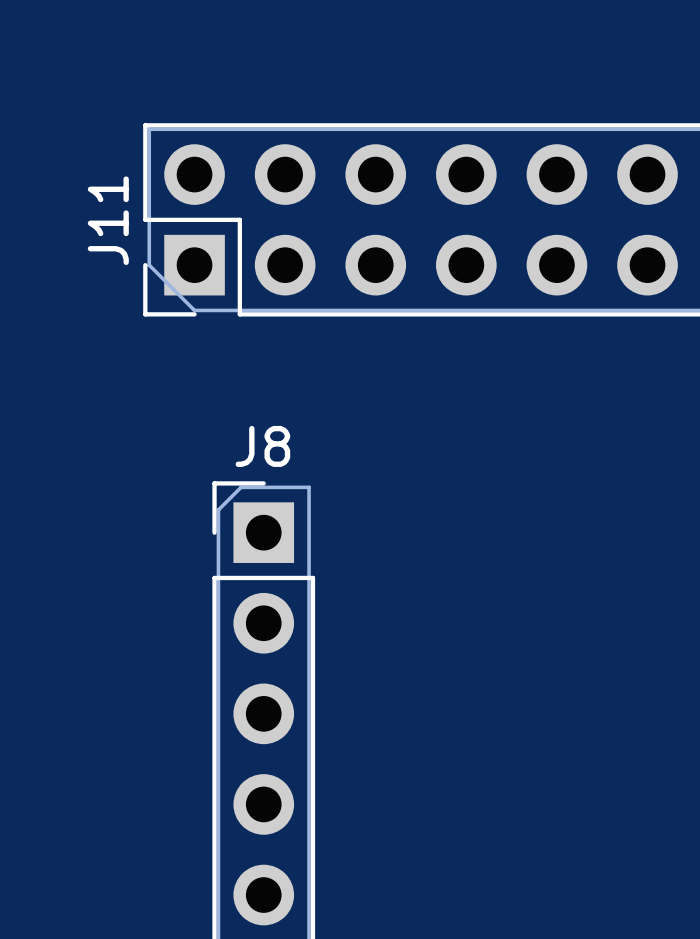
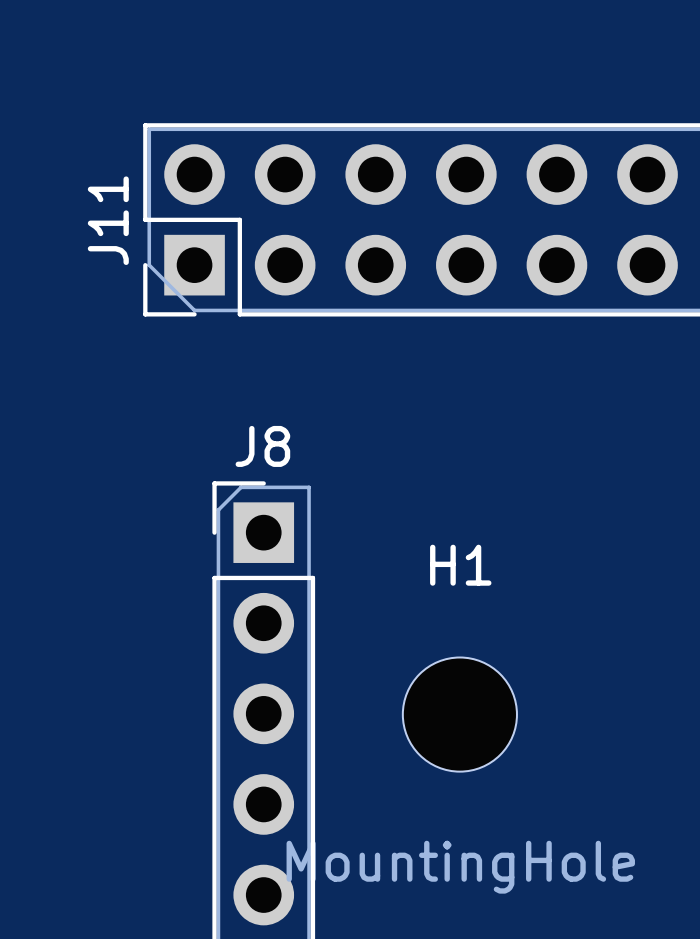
H1: none -> MountingHole (459, 714)

